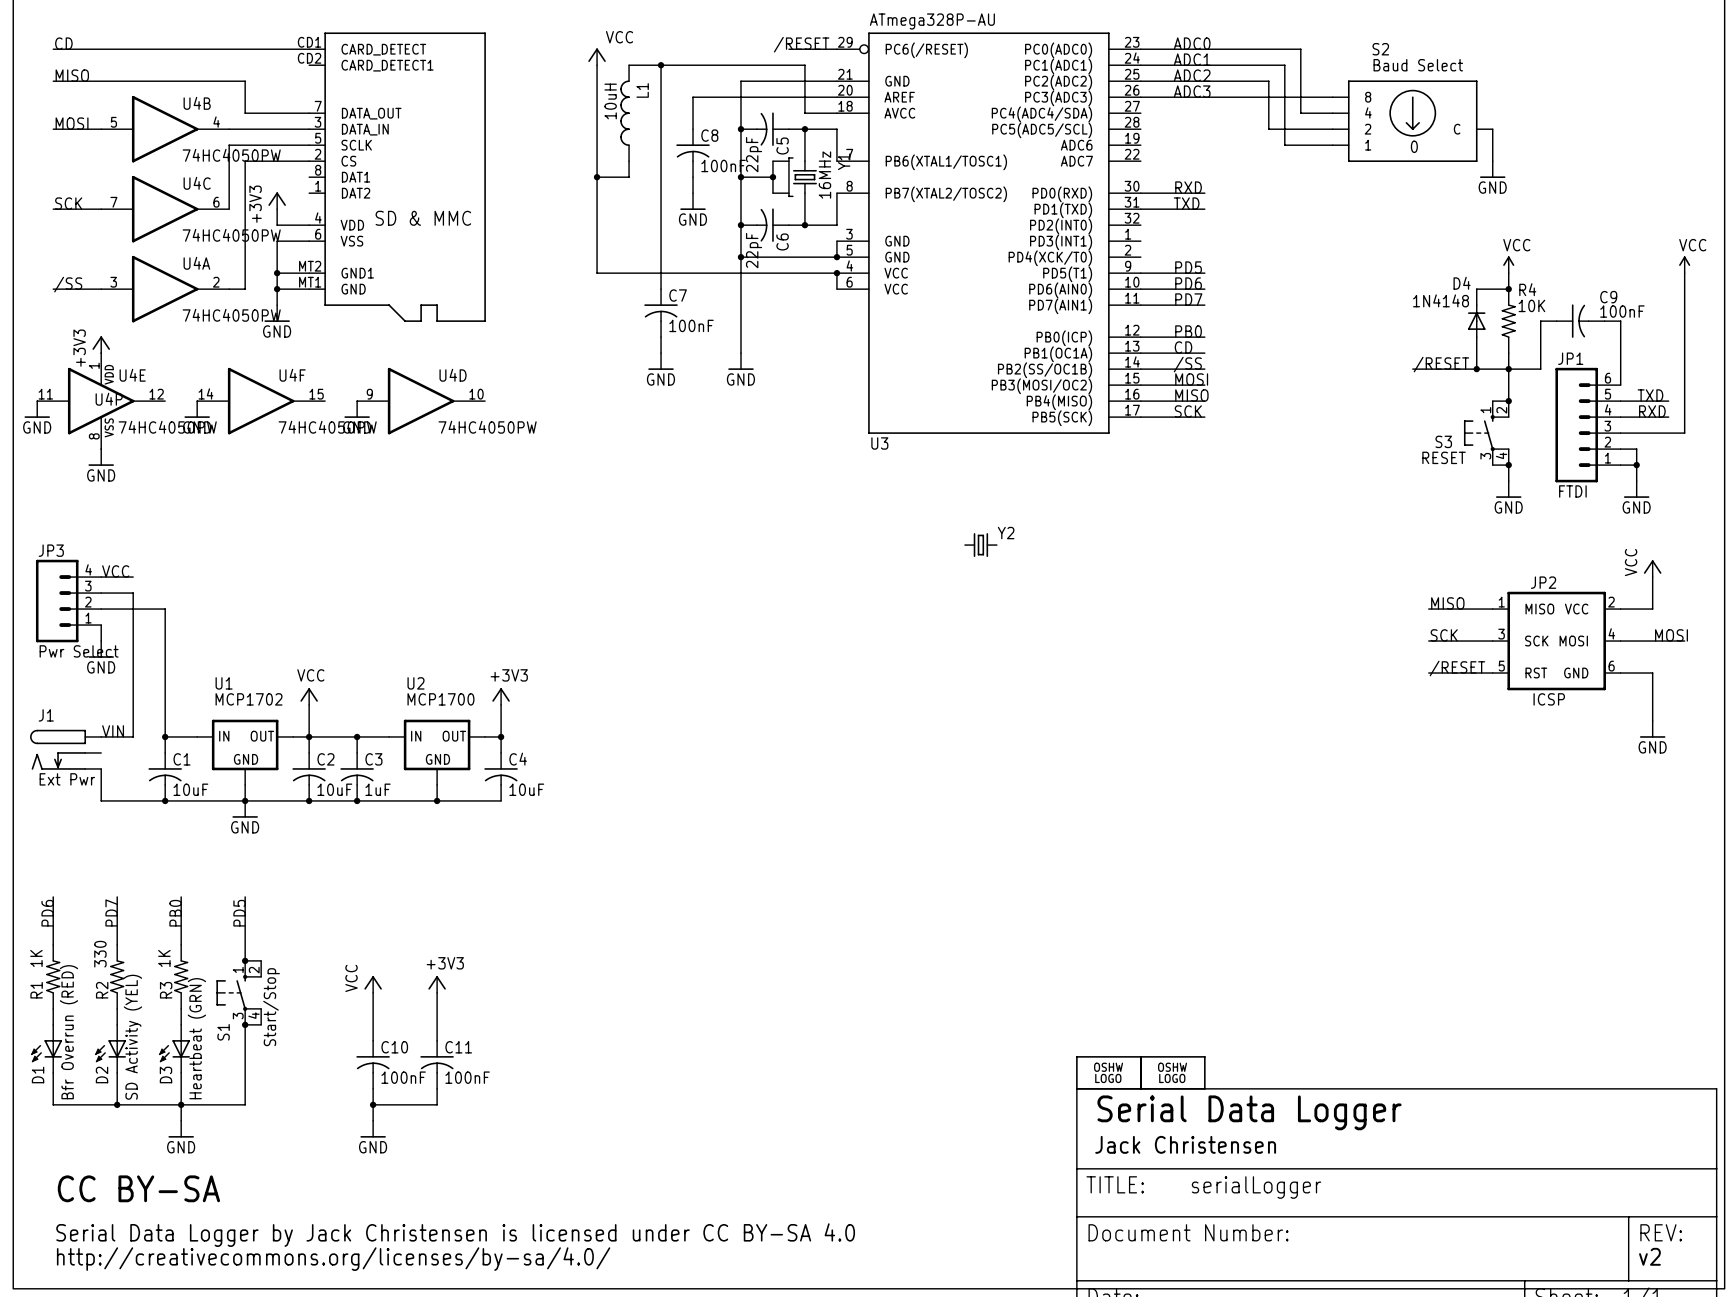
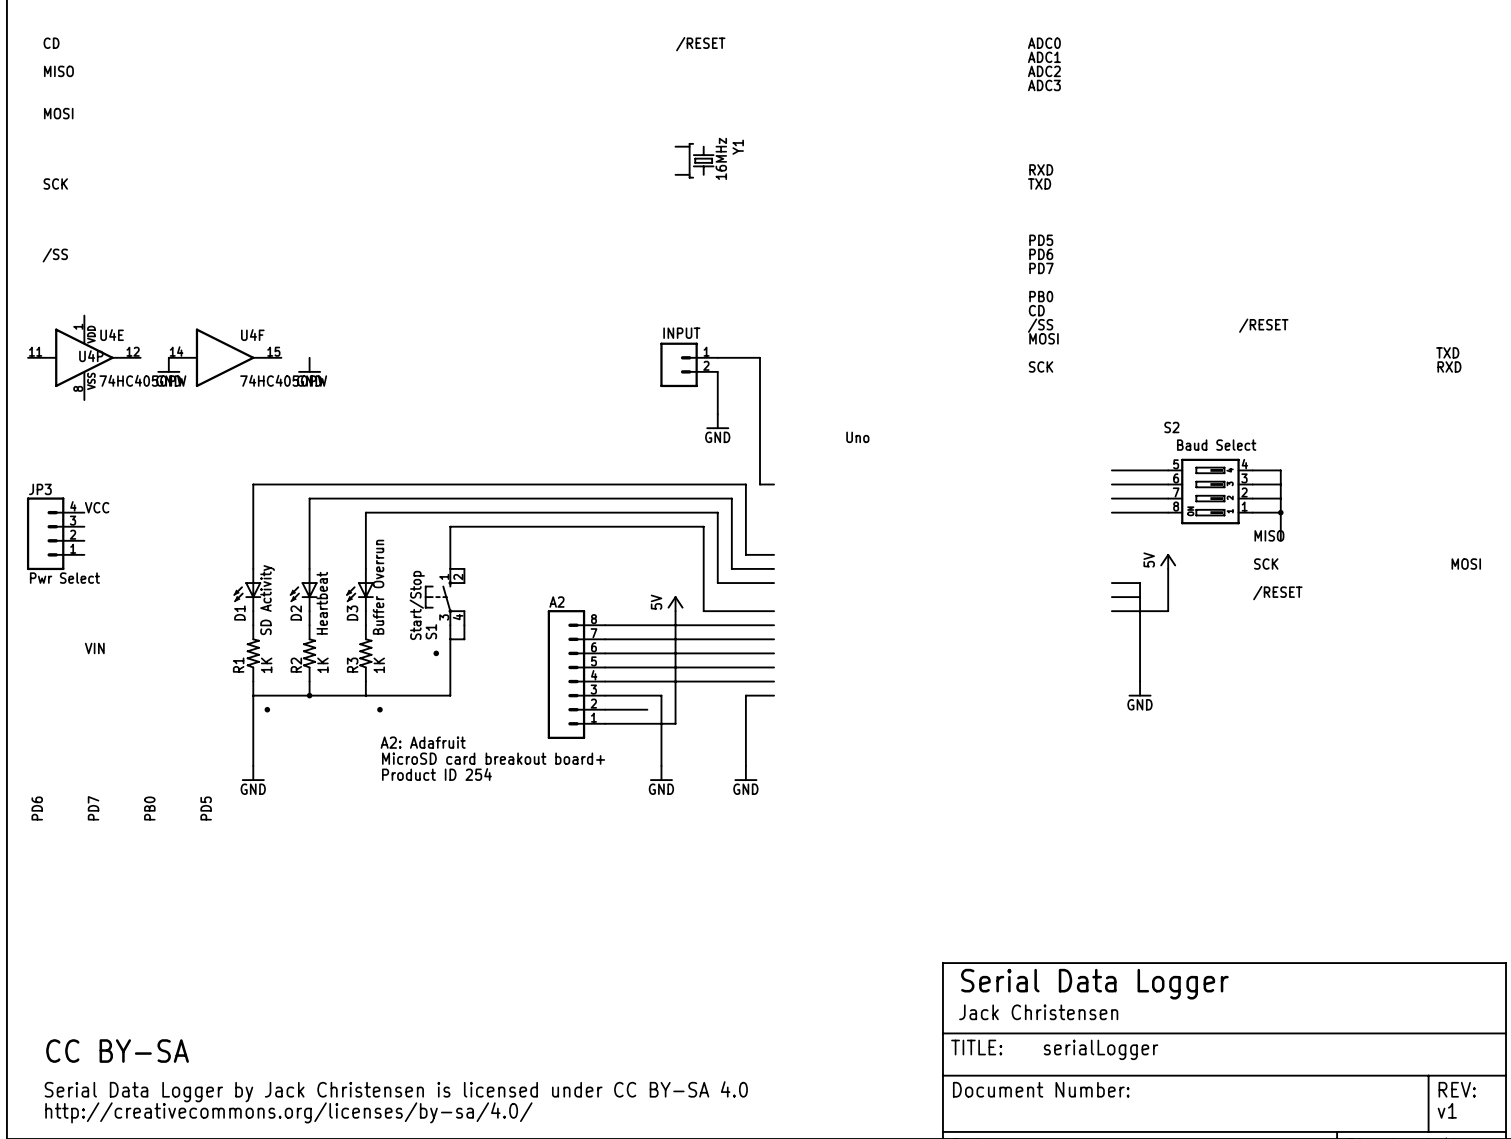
wire: (53, 49) (309, 49) -> none
wire: (788, 49) (836, 49) -> none
wire: (1140, 49) (1300, 49) (1300, 113) (1332, 113) -> none
S2 name position: S2 (1380, 49) -> S2 (1171, 427)
power symbol: VCC (597, 56) -> none
wire: (597, 65) (597, 273) (836, 273) (836, 289) -> none
wire: (629, 65) (804, 65) (804, 113) (836, 113) -> none
wire: (661, 65) (661, 289) -> none
junction: (661, 65) -> none
wire: (1140, 65) (1284, 65) (1284, 145) (1332, 145) -> none
S2 symbol: [1332, 80, 1493, 162] -> [1168, 458, 1253, 525]
wire: (53, 81) (245, 81) (245, 113) (309, 113) -> none
wire: (836, 81) (740, 81) (740, 353) -> none
wire: (1140, 81) (1268, 81) (1268, 129) (1332, 129) -> none
wire: (836, 97) (693, 97) (693, 129) -> none
wire: (1140, 97) (1332, 97) -> none
L1: 10uH (625, 113) -> none
wire: (53, 129) (101, 129) -> none
U4B: 74HC4050PW (165, 129) -> none
wire: (229, 129) (309, 129) -> none
junction: (740, 129) -> none
C5: 22pF (764, 129) -> none
wire: (788, 129) (836, 129) (836, 161) -> none
wire: (804, 129) (804, 161) -> none
junction: (804, 129) -> none
wire: (1492, 129) (1492, 161) -> none
wire: (309, 145) (229, 145) (229, 209) -> none
C8: 100nF (693, 153) -> none
wire: (309, 161) (245, 161) (245, 289) (229, 289) -> none
wire: (629, 161) (629, 177) (597, 177) -> none
wire: (772, 161) (772, 193) -> none
power symbol: GND (1492, 169) -> none
part: (397, 177) -> none
junction: (597, 177) -> none
wire: (693, 177) (693, 193) -> none
wire: (740, 177) (772, 177) -> none
junction: (740, 177) -> none
junction: (772, 177) -> none
wire: (804, 193) (804, 225) -> none
wire: (836, 193) (836, 225) (788, 225) -> none
wire: (1140, 193) (1204, 193) -> none
power symbol: +3V3 (277, 200) -> none
power symbol: GND (693, 201) -> none
wire: (53, 209) (101, 209) -> none
U4C: 74HC4050PW (165, 209) -> none
wire: (277, 209) (277, 225) (309, 225) -> none
wire: (1140, 209) (1204, 209) -> none
junction: (740, 225) -> none
C6: 22pF (764, 225) -> none
junction: (804, 225) -> none
U3: ATmega328P-AU (988, 233) -> none
wire: (309, 241) (277, 241) (277, 305) -> none
wire: (836, 241) (836, 257) (740, 257) -> none
junction: (740, 257) -> none
junction: (836, 257) -> none
power symbol: VCC (1508, 264) -> none
power symbol: VCC (1684, 264) -> none
wire: (277, 273) (309, 273) -> none
junction: (277, 273) -> none
junction: (836, 273) -> none
wire: (1140, 273) (1204, 273) -> none
wire: (1508, 273) (1508, 289) (1476, 289) (1476, 305) -> none
wire: (1684, 273) (1684, 433) (1620, 433) -> none
wire: (53, 289) (101, 289) -> none
U4A: 74HC4050PW (165, 289) -> none
wire: (277, 289) (309, 289) -> none
junction: (277, 289) -> none
wire: (1140, 289) (1204, 289) -> none
junction: (1508, 289) -> none
wire: (1140, 305) (1204, 305) -> none
power symbol: GND (277, 313) -> none
C7: 100nF (661, 313) -> none
D4: 1N4148 (1476, 321) -> none
R4: 10K (1508, 321) -> none
wire: (1556, 321) (1540, 321) (1540, 369) (1412, 369) -> none
C9: 100nF (1580, 321) -> none
wire: (1604, 321) (1620, 321) (1620, 385) -> none
wire: (661, 337) (661, 353) -> none
wire: (1140, 337) (1204, 337) -> none
wire: (1476, 337) (1476, 369) -> none
power symbol: +3V3 (101, 344) -> none
wire: (1140, 353) (1204, 353) -> none
wire: (1508, 353) (1508, 401) (1492, 401) -> none
power symbol: GND (661, 361) -> none
power symbol: GND (740, 361) -> none
wire: (1140, 369) (1204, 369) -> none
junction: (1476, 369) -> none
junction: (1508, 369) -> none
wire: (1140, 385) (1204, 385) -> none
label: MISO (1191, 395) -> none
U4D: 74HC4050PW (421, 401) -> none
wire: none -> (717, 357) (760, 357) (760, 484) (774, 484)
wire: (1140, 401) (1204, 401) -> none
junction: (1508, 401) -> none
wire: (1620, 401) (1668, 401) -> none
power symbol: GND (37, 409) -> none
INPUT: none -> (689, 364)
wire: none -> (717, 371) (717, 414)
wire: (1140, 417) (1204, 417) -> none
wire: (1620, 417) (1668, 417) -> none
JP1: FTDI (1588, 425) -> none
S3: RESET (1486, 433) -> none
wire: (1620, 449) (1636, 449) (1636, 481) -> none
power symbol: GND (101, 457) -> none
wire: (1492, 465) (1508, 465) (1508, 481) -> none
junction: (1508, 465) -> none
wire: (1620, 465) (1636, 465) -> none
junction: (1636, 465) -> none
power symbol: none -> GND (717, 421)
power symbol: GND (1508, 489) -> none
power symbol: GND (1636, 489) -> none
text: none -> Uno (857, 437)
wire: none -> (1111, 470) (1168, 470)
wire: none -> (1252, 470) (1280, 470) (1280, 540)
Y2: (980, 545) -> none
wire: none -> (1111, 484) (1168, 484)
wire: none -> (1252, 484) (1280, 484)
wire: none -> (1111, 498) (1168, 498)
wire: none -> (1252, 498) (1280, 498)
power symbol: VCC (1652, 568) -> none
wire: (101, 577) (133, 577) -> none
wire: none -> (1111, 512) (1168, 512)
wire: none -> (1252, 512) (1280, 512)
junction: none -> (1280, 512)
wire: (1652, 577) (1652, 609) (1620, 609) -> none
wire: (101, 593) (133, 593) (133, 736) (101, 736) -> none
wire: (101, 609) (165, 609) (165, 752) -> none
wire: (1428, 609) (1492, 609) -> none
wire: (101, 625) (101, 641) -> none
wire: none -> (774, 554) (745, 554) (745, 484) (253, 484) (253, 568)
power symbol: none -> 5V (1168, 561)
wire: none -> (309, 568) (309, 498) (731, 498) (731, 568) (774, 568)
wire: none -> (365, 568) (365, 512) (717, 512) (717, 583) (774, 583)
wire: none -> (464, 568) (450, 568) (450, 526) (703, 526) (703, 611) (774, 611)
wire: none -> (1168, 568) (1168, 611) (1111, 611)
wire: (1428, 641) (1492, 641) -> none
JP2: ICSP (1556, 641) -> none
wire: (1620, 641) (1684, 641) -> none
power symbol: GND (101, 649) -> none
wire: none -> (1111, 583) (1140, 583) (1140, 681)
wire: none -> (1111, 597) (1140, 597)
wire: (1428, 673) (1492, 673) -> none
wire: (1620, 673) (1652, 673) (1652, 720) -> none
power symbol: none -> 5V (675, 603)
wire: none -> (309, 611) (309, 625)
wire: none -> (365, 611) (365, 625)
wire: none -> (675, 611) (675, 723) (605, 723)
power symbol: VCC (309, 696) -> none
power symbol: +3V3 (501, 696) -> none
wire: (309, 704) (309, 752) -> none
wire: (501, 704) (501, 752) -> none
wire: none -> (450, 625) (450, 695) (253, 695)
wire: none -> (464, 625) (464, 639) (450, 639)
wire: none -> (605, 625) (774, 625)
wire: none -> (605, 639) (774, 639)
power symbol: GND (1652, 729) -> none
wire: (165, 736) (197, 736) -> none
junction: (165, 736) -> none
wire: (293, 736) (389, 736) -> none
junction: (309, 736) -> none
junction: (357, 736) -> none
wire: (485, 736) (501, 736) -> none
wire: none -> (605, 653) (774, 653)
J1: Ext Pwr (65, 749) -> none
U1: MCP1702 (245, 752) -> none
U2: MCP1700 (437, 752) -> none
wire: none -> (605, 667) (774, 667)
A2: none -> (576, 674)
wire: (101, 768) (101, 800) (501, 800) -> none
wire: none -> (253, 681) (253, 766)
wire: none -> (605, 681) (774, 681)
C1: 10uF (165, 776) -> none
C2: 10uF (309, 776) -> none
C3: 1uF (357, 776) -> none
C4: 10uF (501, 776) -> none
power symbol: none -> GND (1140, 688)
wire: (245, 784) (245, 800) -> (253, 611) (253, 625)
wire: (437, 784) (437, 800) -> (365, 681) (365, 695)
wire: none -> (605, 695) (661, 695) (661, 766)
wire: none -> (774, 695) (745, 695) (745, 766)
junction: (165, 800) -> none
junction: (245, 800) -> none
junction position: (357, 800) -> (309, 695)
wire: none -> (605, 709) (647, 709)
power symbol position: GND (245, 809) -> GND (253, 773)
text: none -> A2: Adafruit (423, 742)
text: none -> MicroSD card breakout board+ (493, 758)
power symbol: none -> GND (661, 773)
power symbol: none -> GND (745, 773)
text: none -> Product ID 254 (436, 774)
wire: (53, 896) (53, 944) -> none
wire: (117, 896) (117, 944) -> none
wire: (181, 896) (181, 944) -> none
wire: (245, 896) (245, 960) (261, 960) -> none
R2 value: 330 (100, 954) -> 1K (322, 665)
R1 value position: 1K (36, 958) -> 1K (266, 665)
R3 value position: 1K (164, 958) -> 1K (379, 665)
junction: (245, 960) -> none
R1 position: (53, 976) -> (253, 653)
R2 position: (117, 976) -> (309, 653)
R3 position: (181, 976) -> (365, 653)
power symbol: VCC (373, 984) -> none
power symbol: +3V3 (437, 984) -> none
S1 position: (239, 992) -> (444, 597)
wire: (373, 992) (373, 1040) -> none
wire: (437, 992) (437, 1040) -> none
S1 value position: Start/Stop (271, 1007) -> Start/Stop (417, 605)
wire: (53, 1008) (53, 1024) -> none
wire: (117, 1008) (117, 1024) -> none
wire: (181, 1008) (181, 1024) -> none
junction: (245, 1024) -> none
wire: (261, 1024) (245, 1024) (245, 1104) (53, 1104) (53, 1072) -> none
D1 value: Bfr Overrun (RED) (68, 1032) -> SD Activity (267, 600)
D2 value: SD Activity (YEL) (132, 1037) -> Heartbeat (322, 603)
D3 value: Heartbeat (GRN) (196, 1038) -> Buffer Overrun (378, 587)
D1 position: (46, 1048) -> (247, 590)
D2 position: (110, 1048) -> (303, 590)
D3 position: (174, 1048) -> (360, 590)
C10: 100nF (373, 1064) -> none
C11: 100nF (437, 1064) -> none
wire: (117, 1072) (117, 1104) -> none
wire: (181, 1072) (181, 1120) -> none
part: (1108, 1072) -> none
part: (1172, 1072) -> none
wire: (373, 1088) (373, 1120) -> none
wire: (437, 1088) (437, 1104) (373, 1104) -> none
junction: (117, 1104) -> none
junction: (181, 1104) -> none
junction: (373, 1104) -> none
power symbol: GND (181, 1129) -> none
power symbol: GND (373, 1129) -> none
text: v2 (1649, 1256) -> v1 (1447, 1110)

